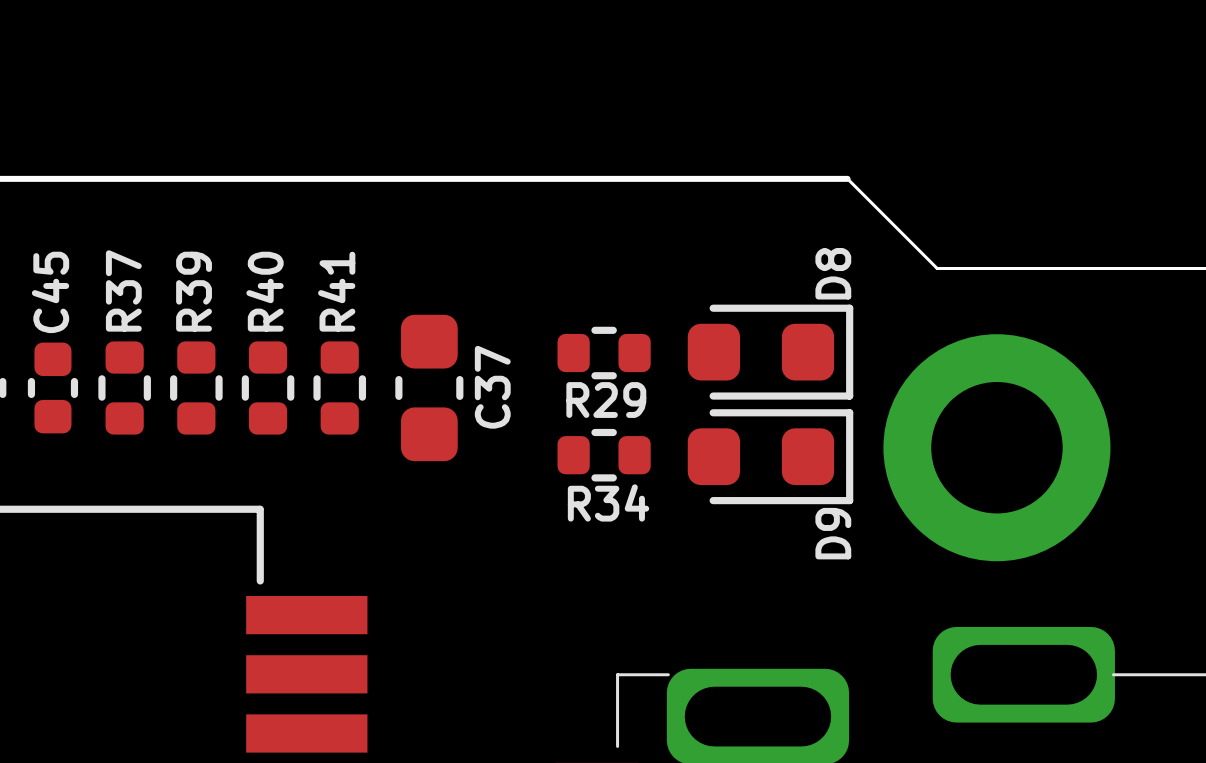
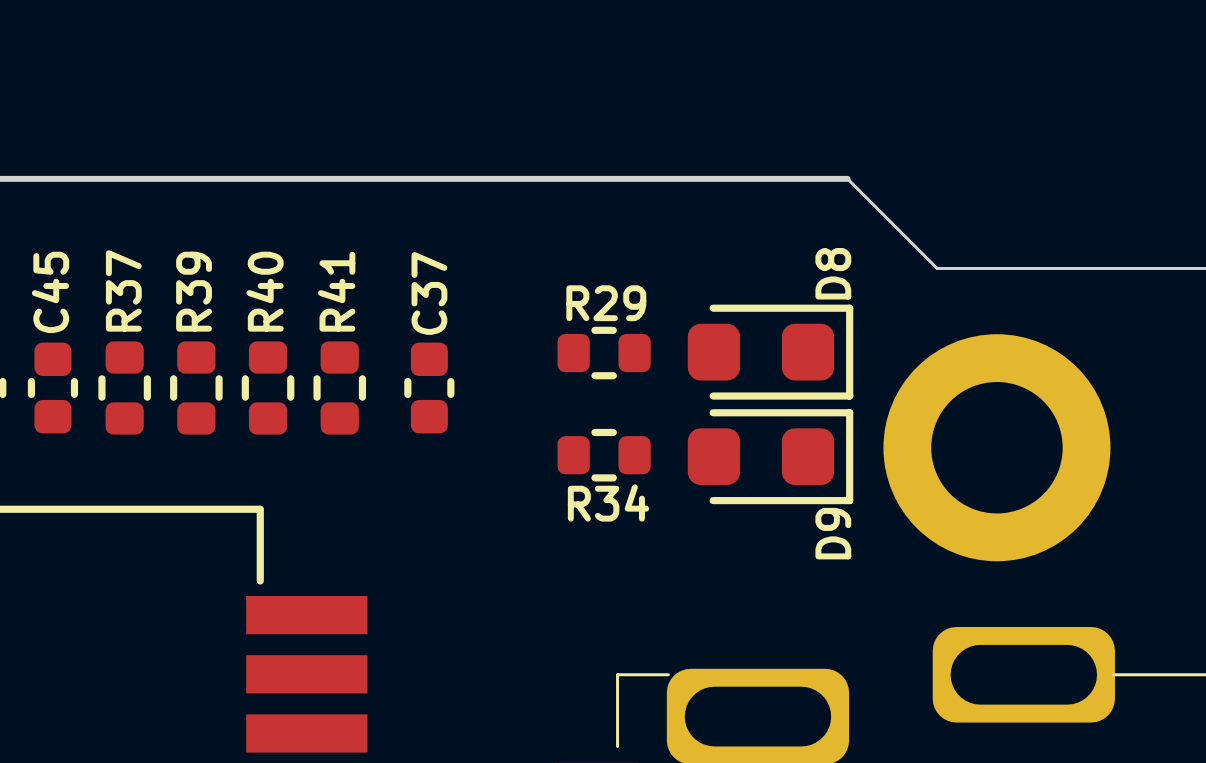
C37 footprint: [395, 314, 464, 462] -> [404, 342, 455, 434]
C37 name position: C37 (492, 387) -> C37 (429, 293)
R29 name position: R29 (606, 400) -> R29 (606, 303)

